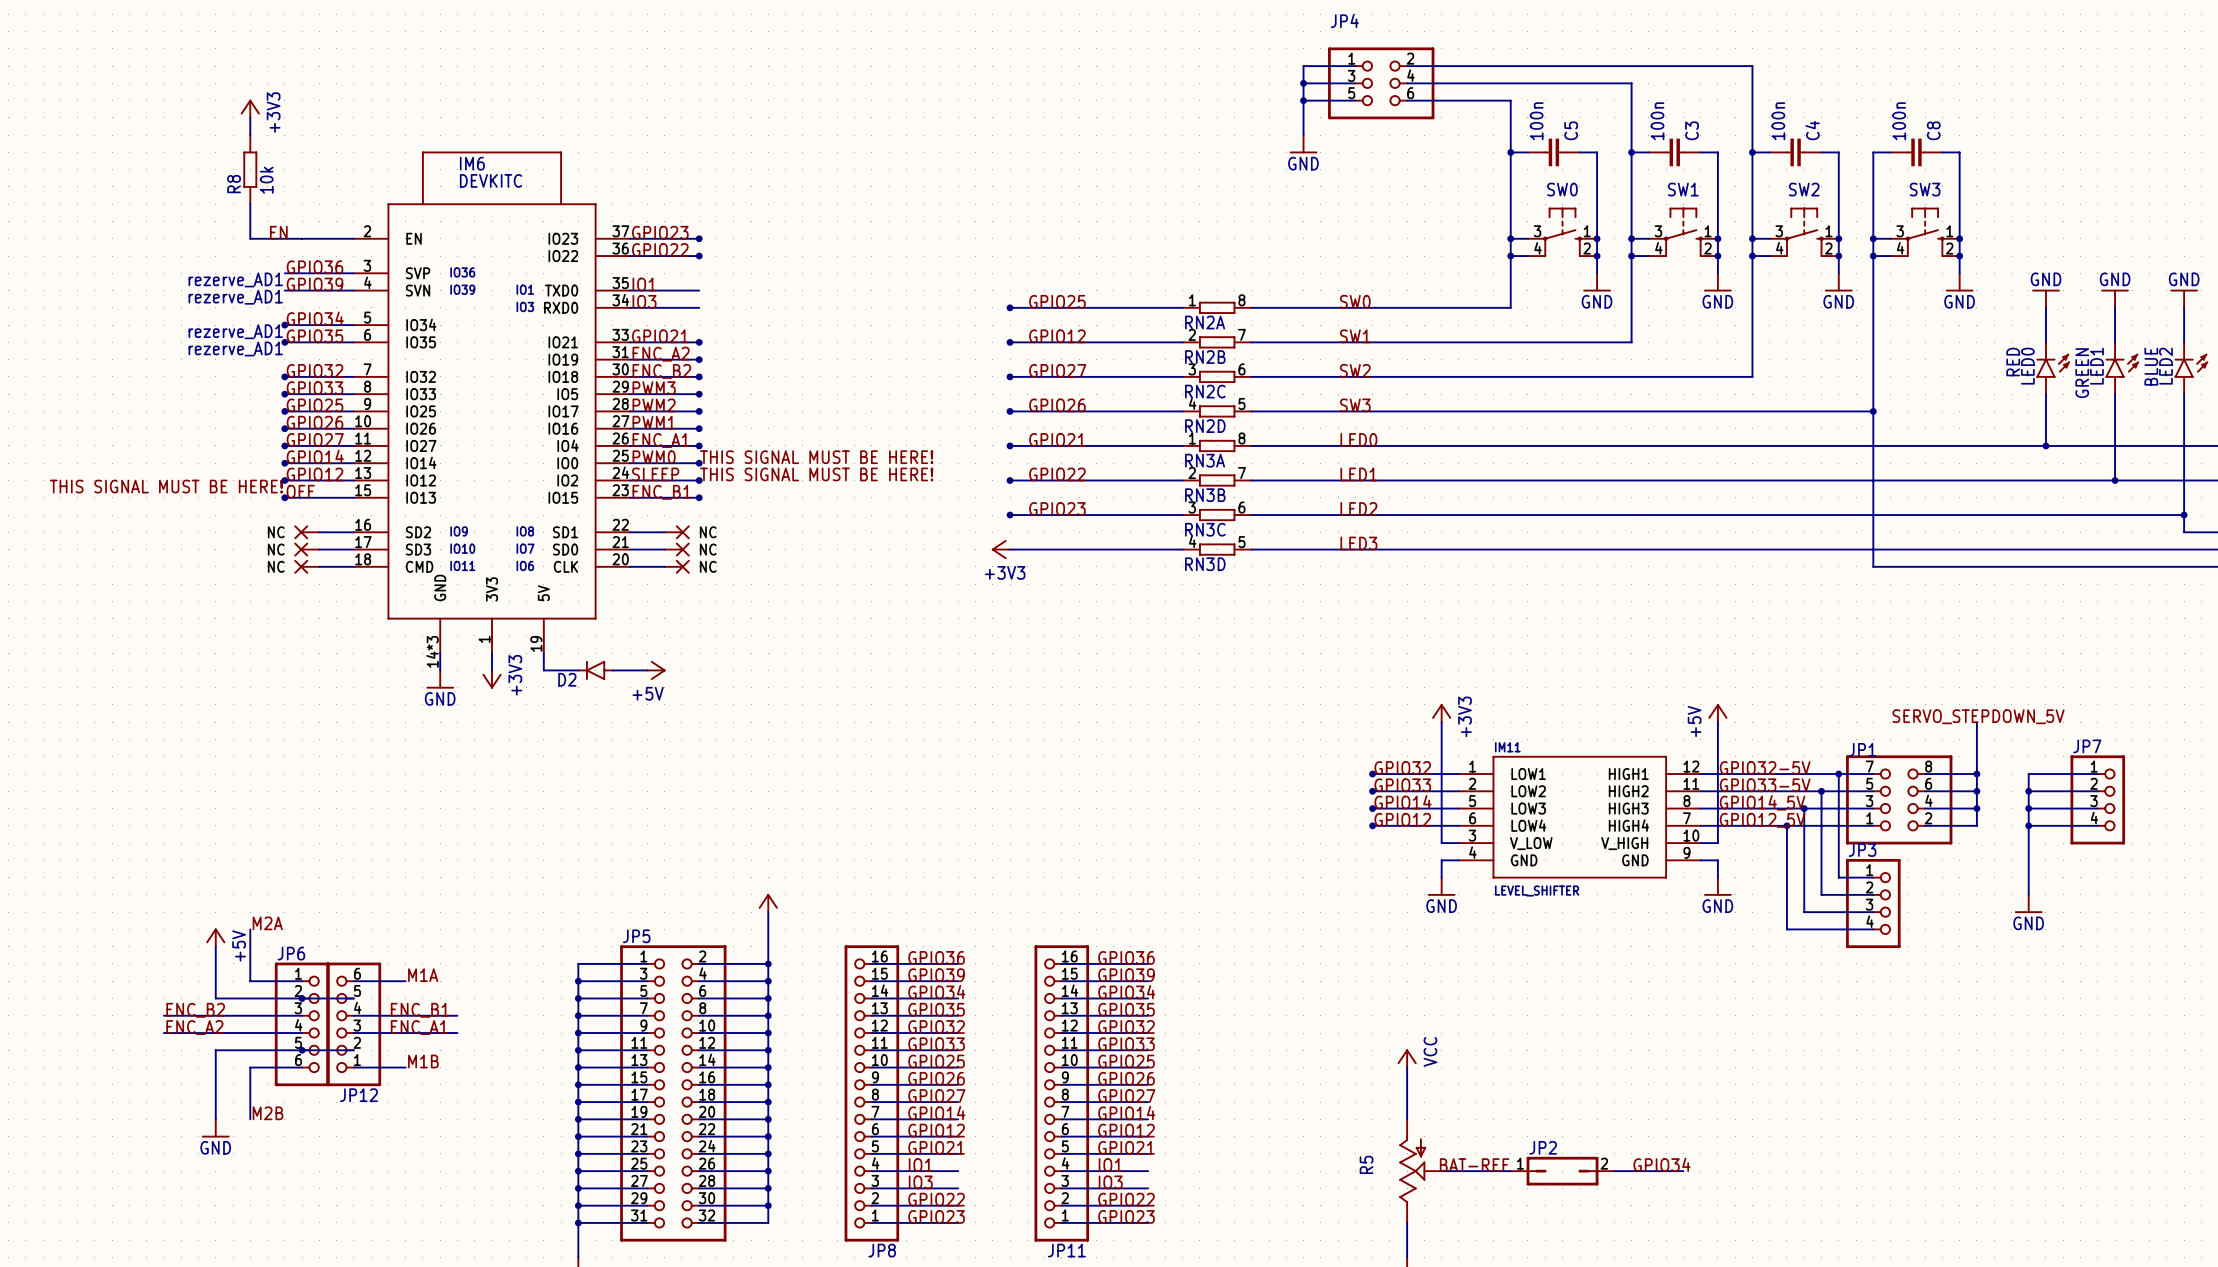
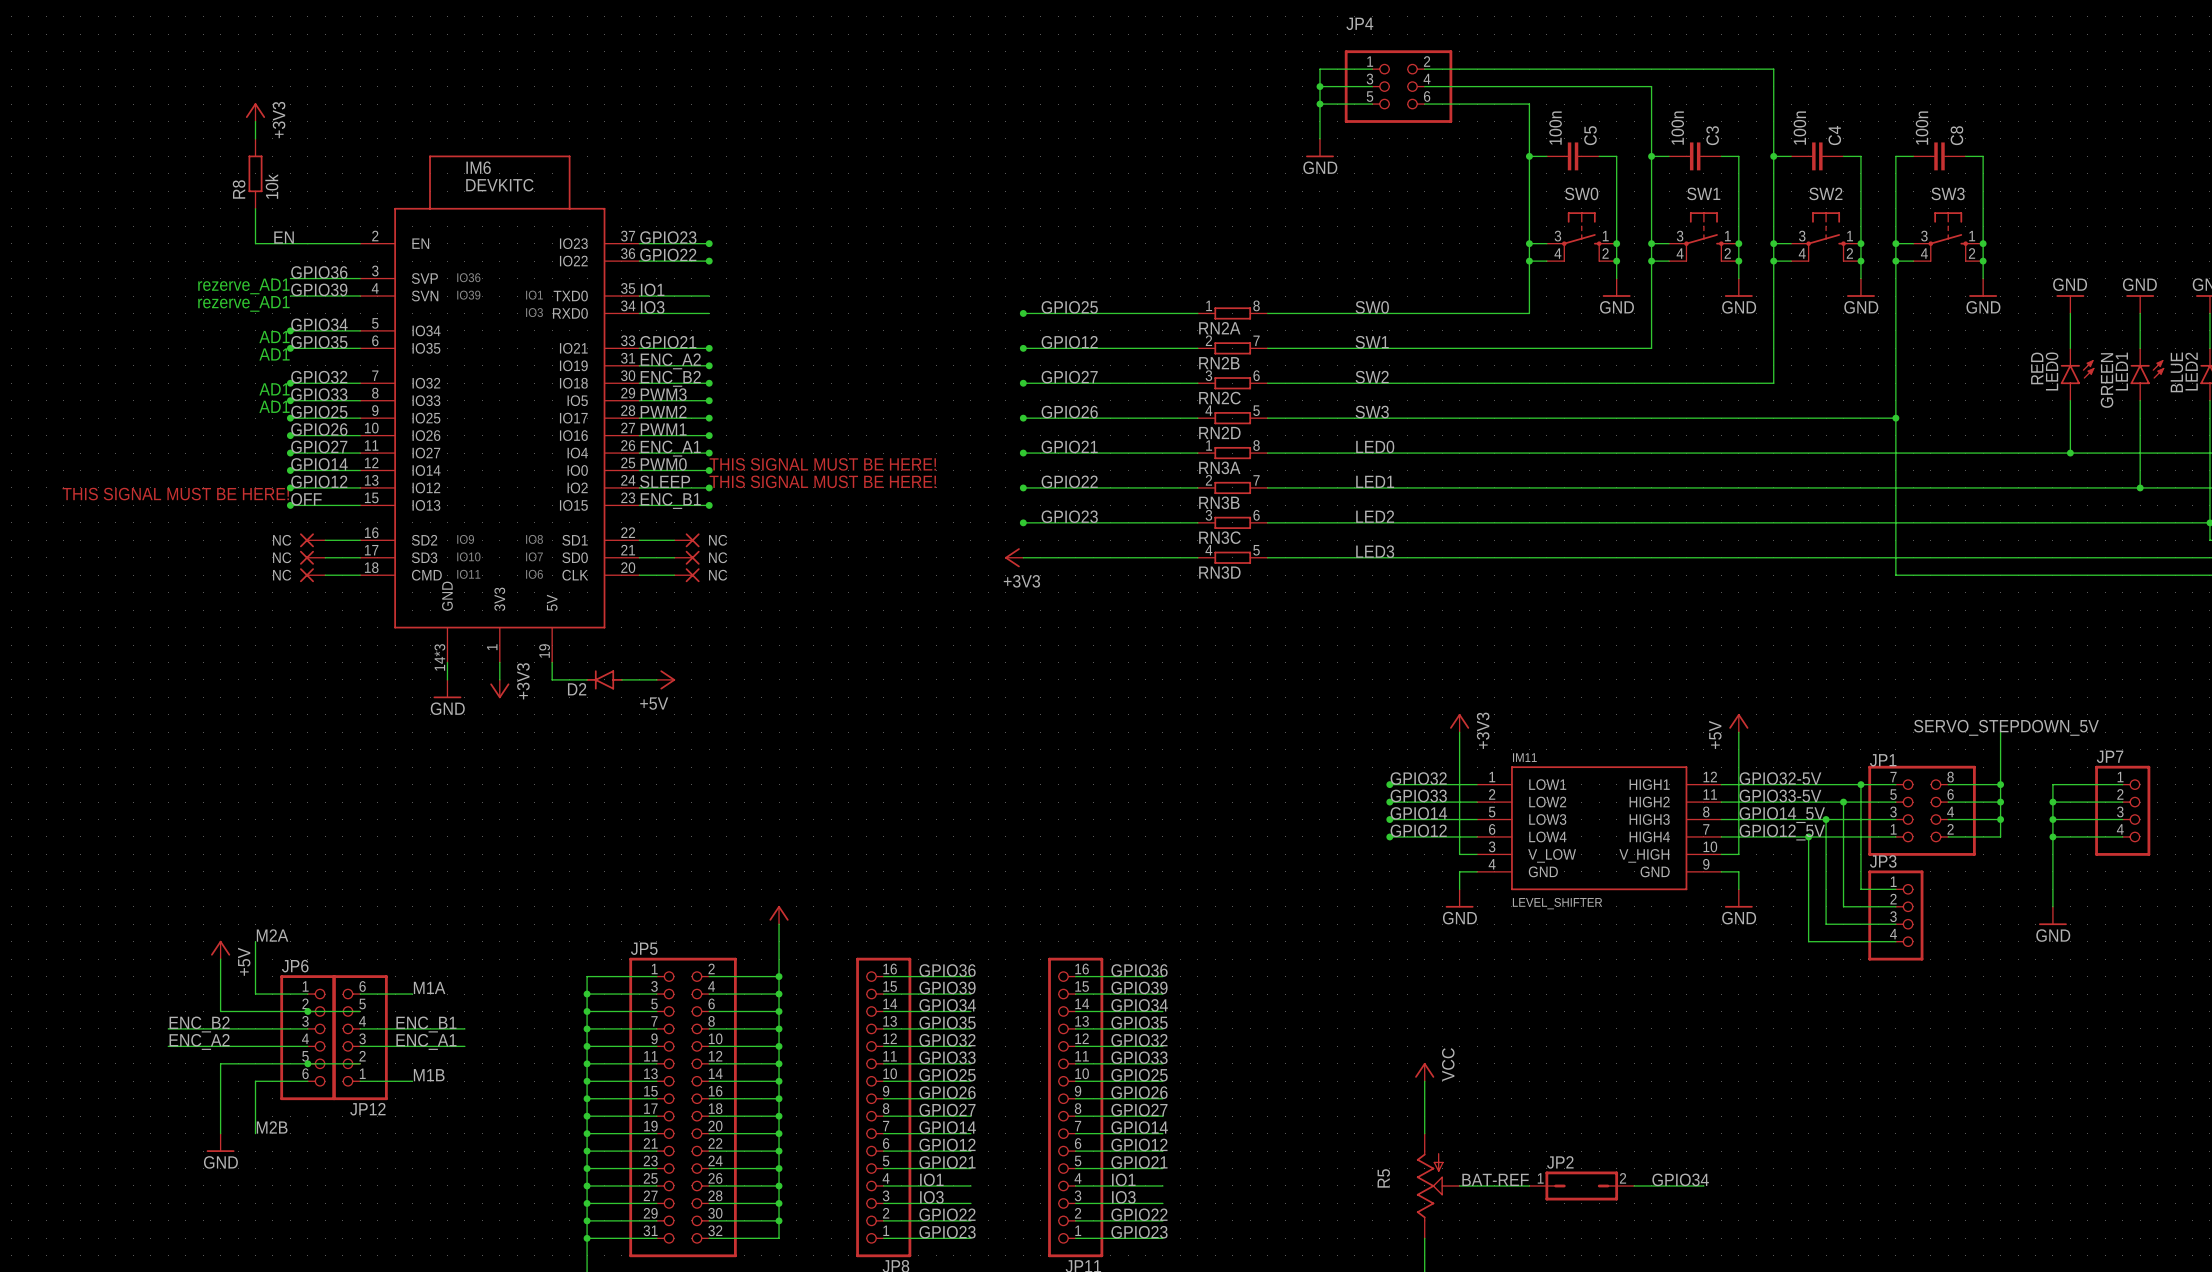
text: rezerve_AD1 (235, 331) -> AD1 (274, 337)
text: rezerve_AD1 (235, 348) -> AD1 (274, 354)
text: none -> AD1 (274, 389)
text: none -> AD1 (274, 406)

